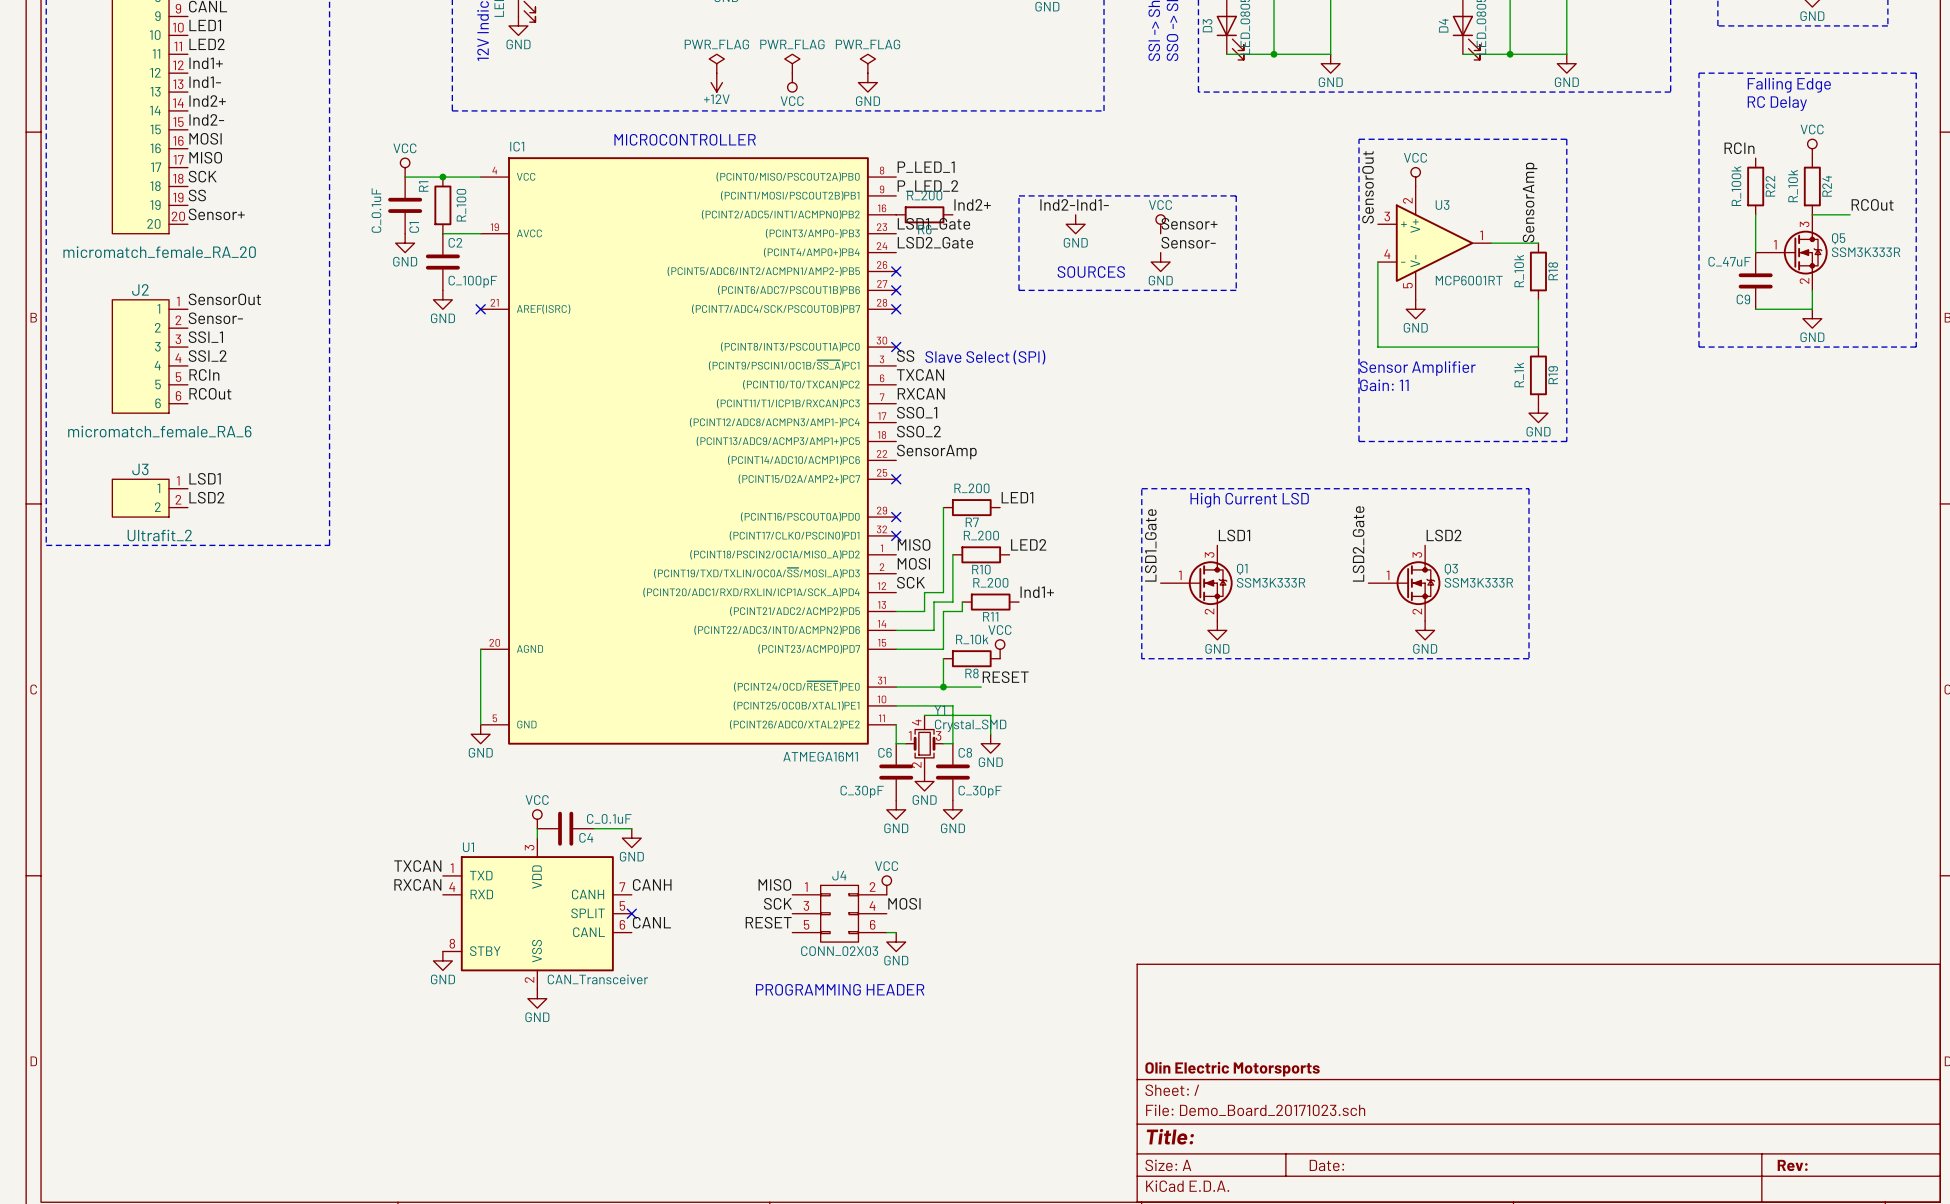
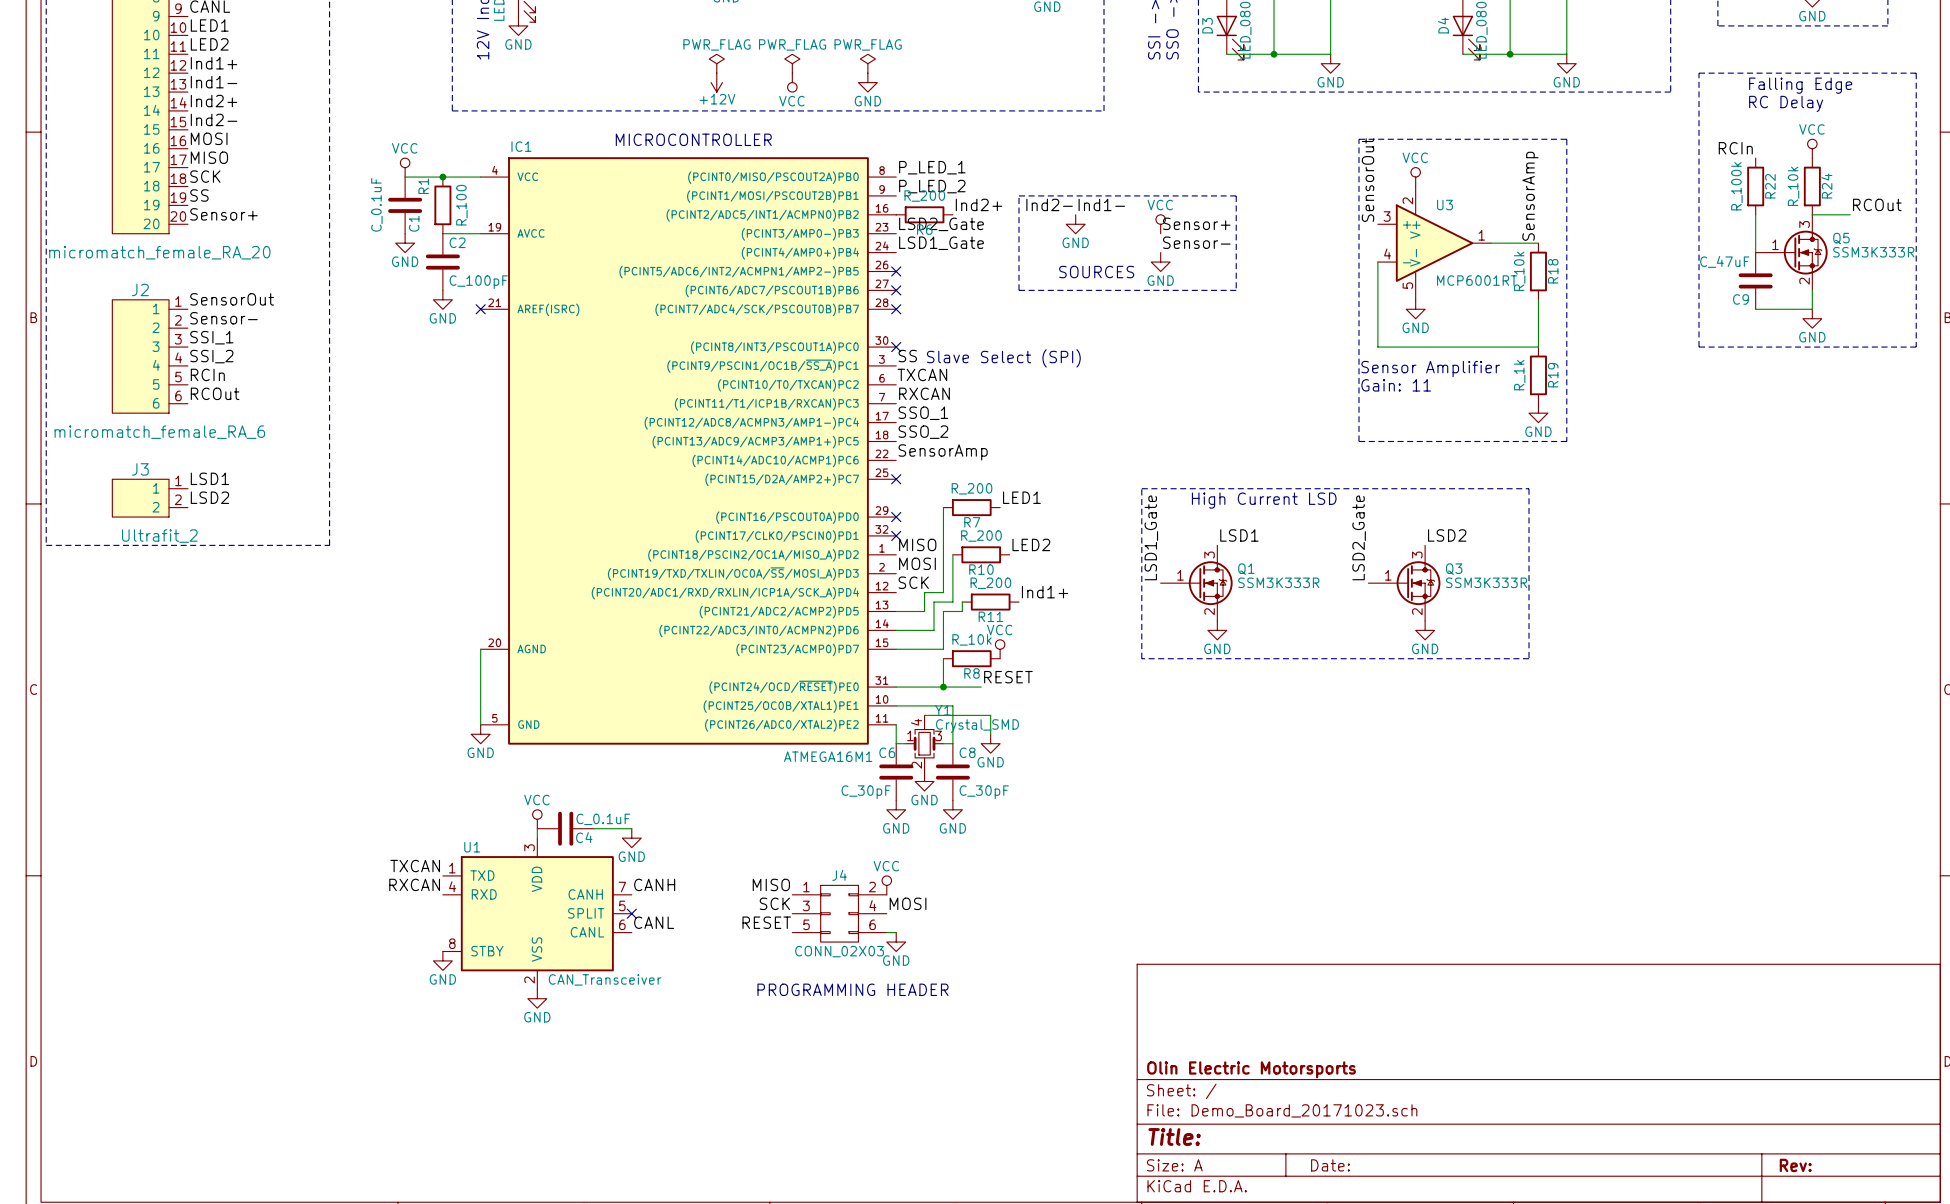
label: LSD1_Gate (933, 223) -> LSD2_Gate (941, 224)
label: LSD2_Gate (935, 242) -> LSD1_Gate (941, 243)

